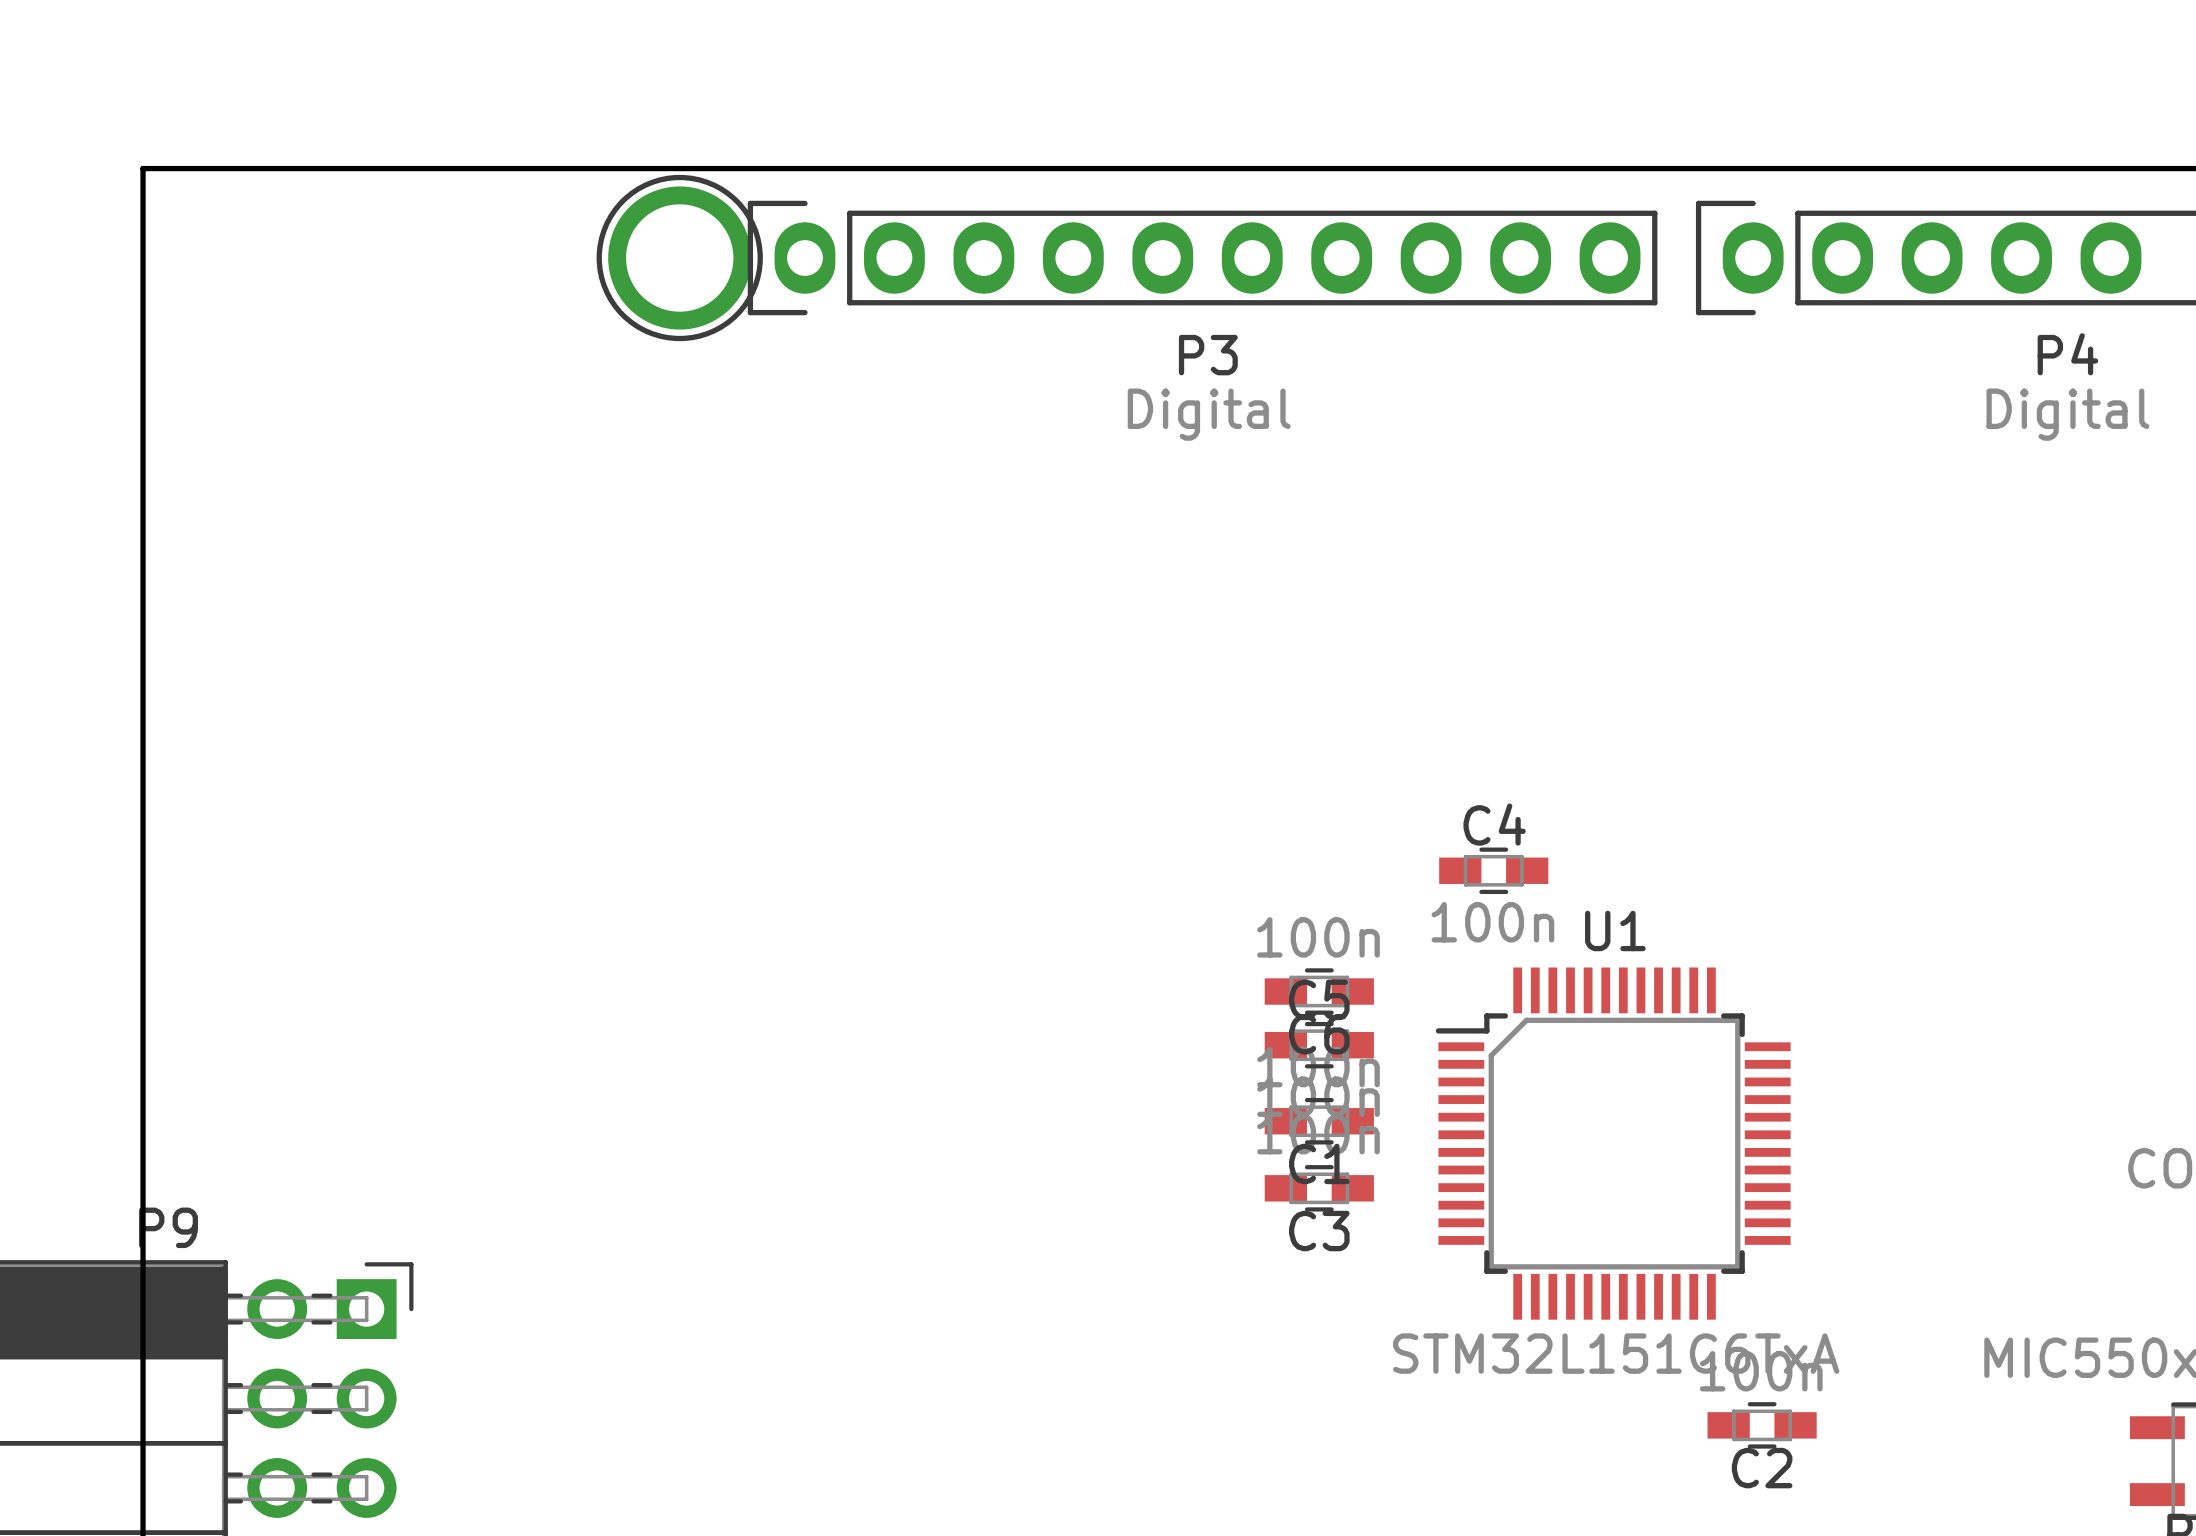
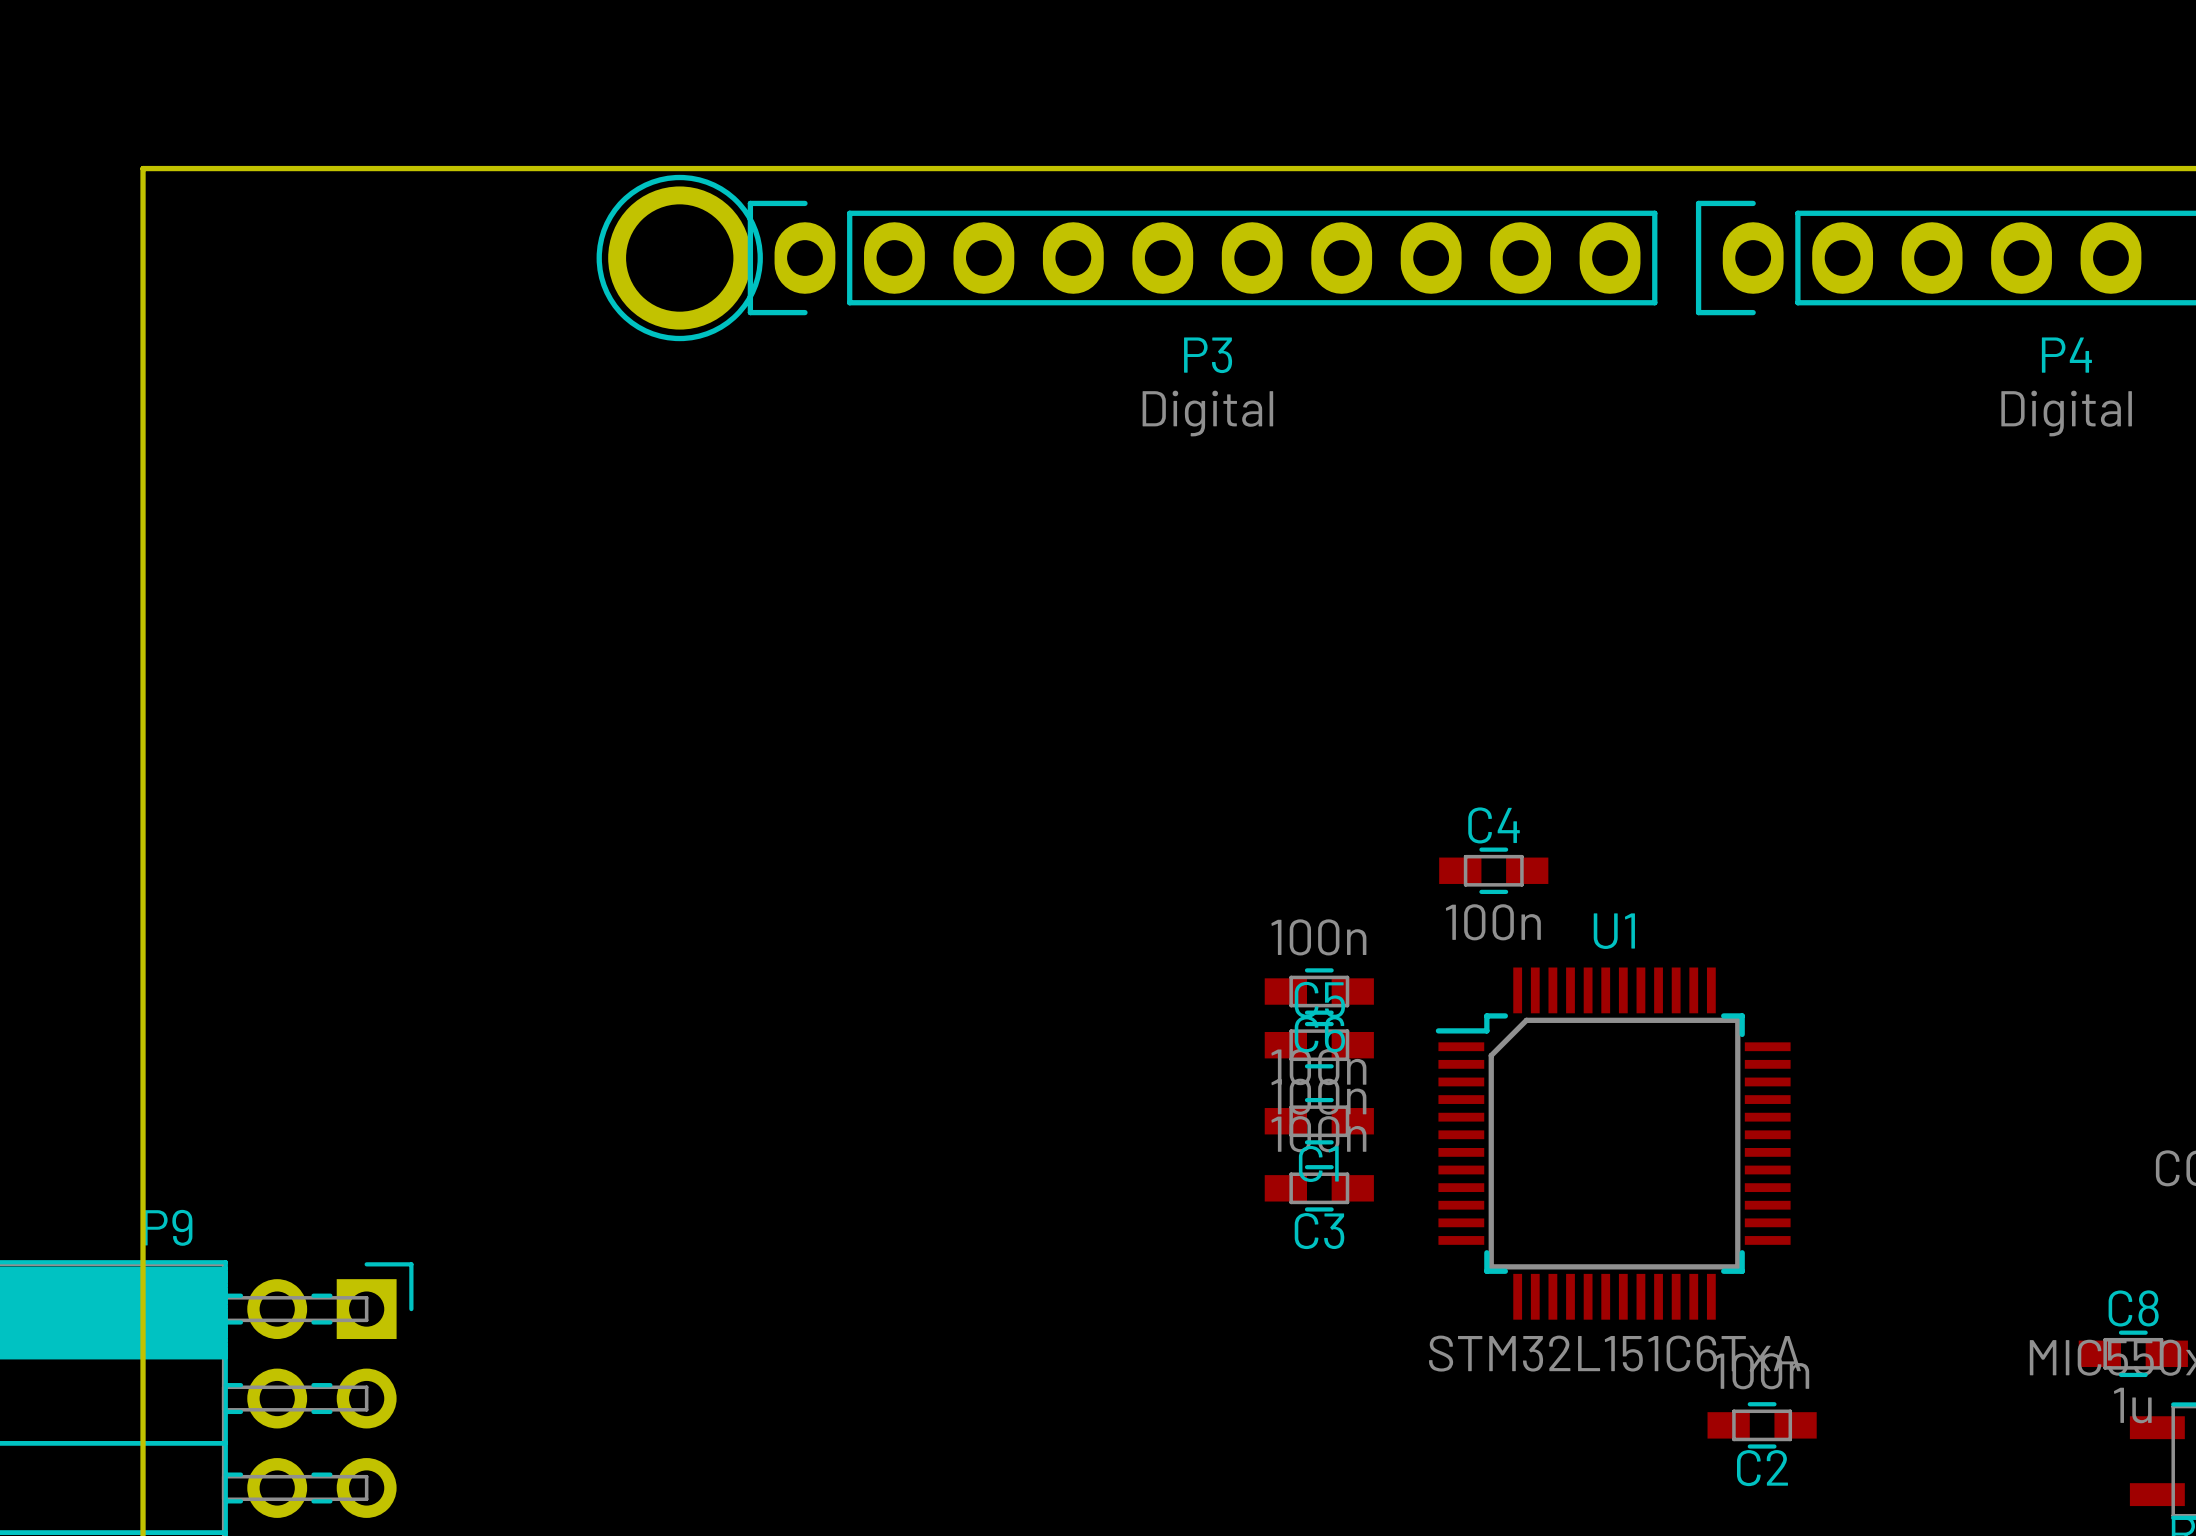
C8: none -> 1u (2133, 1353)

